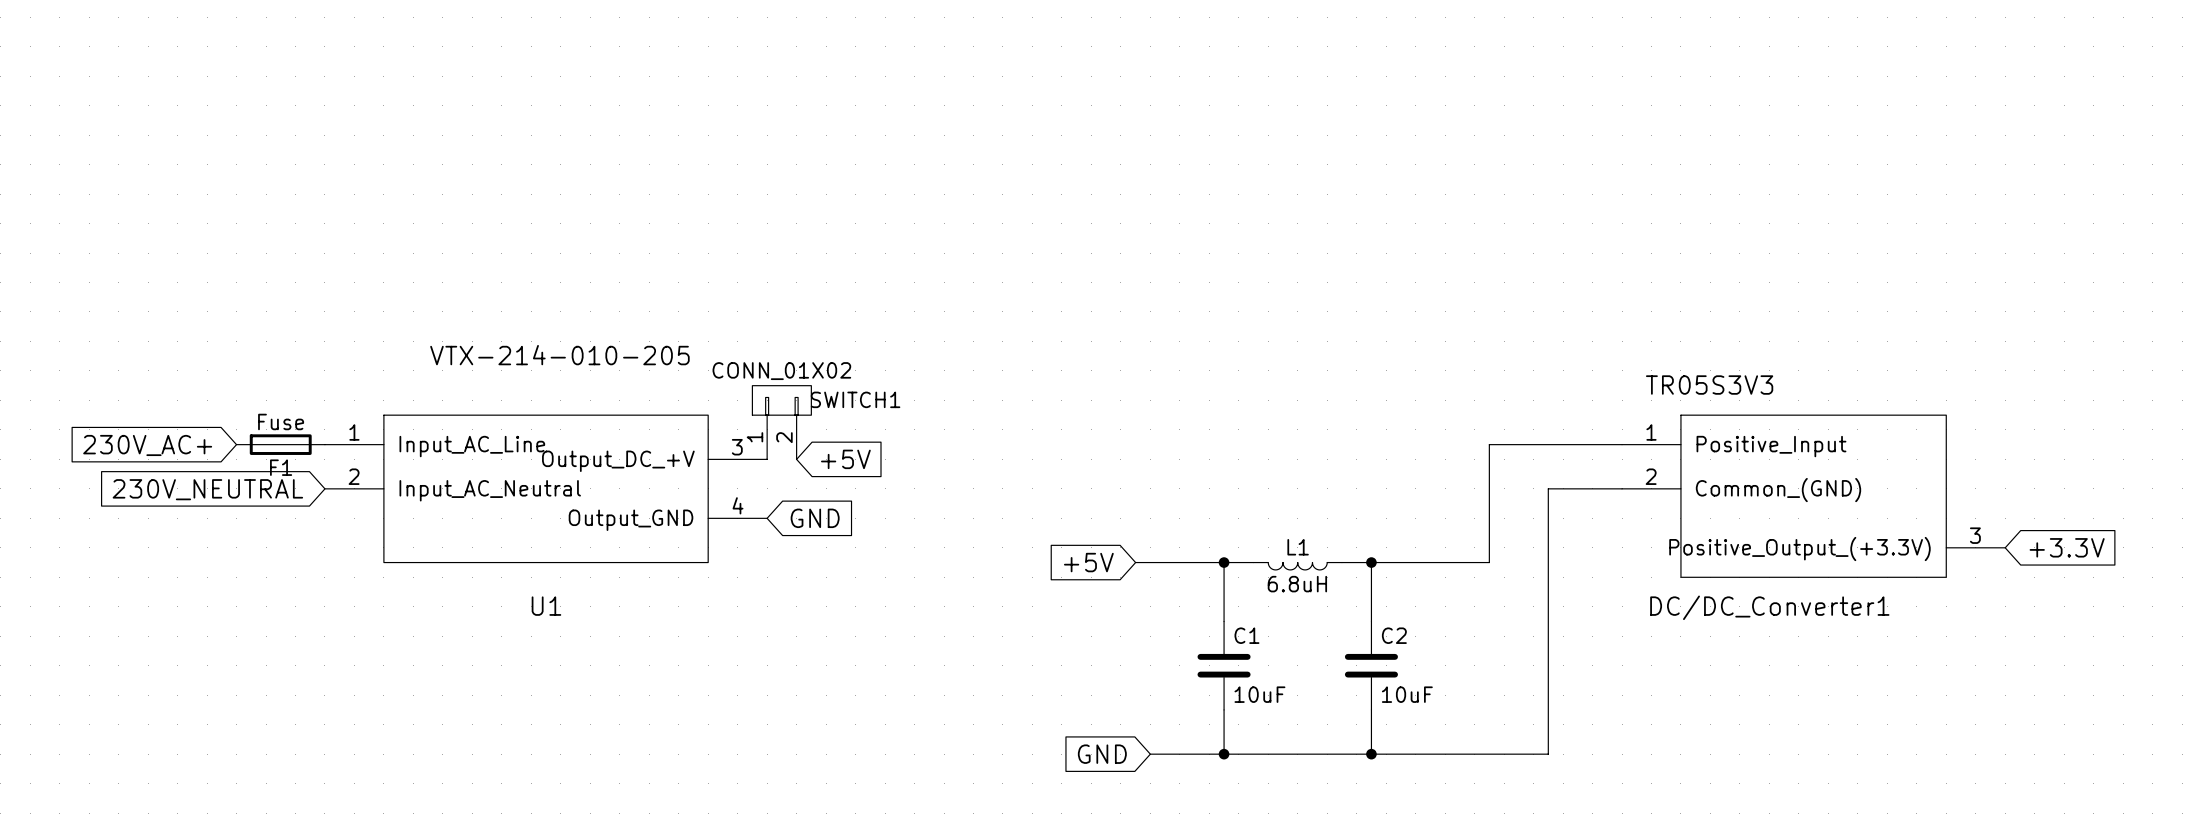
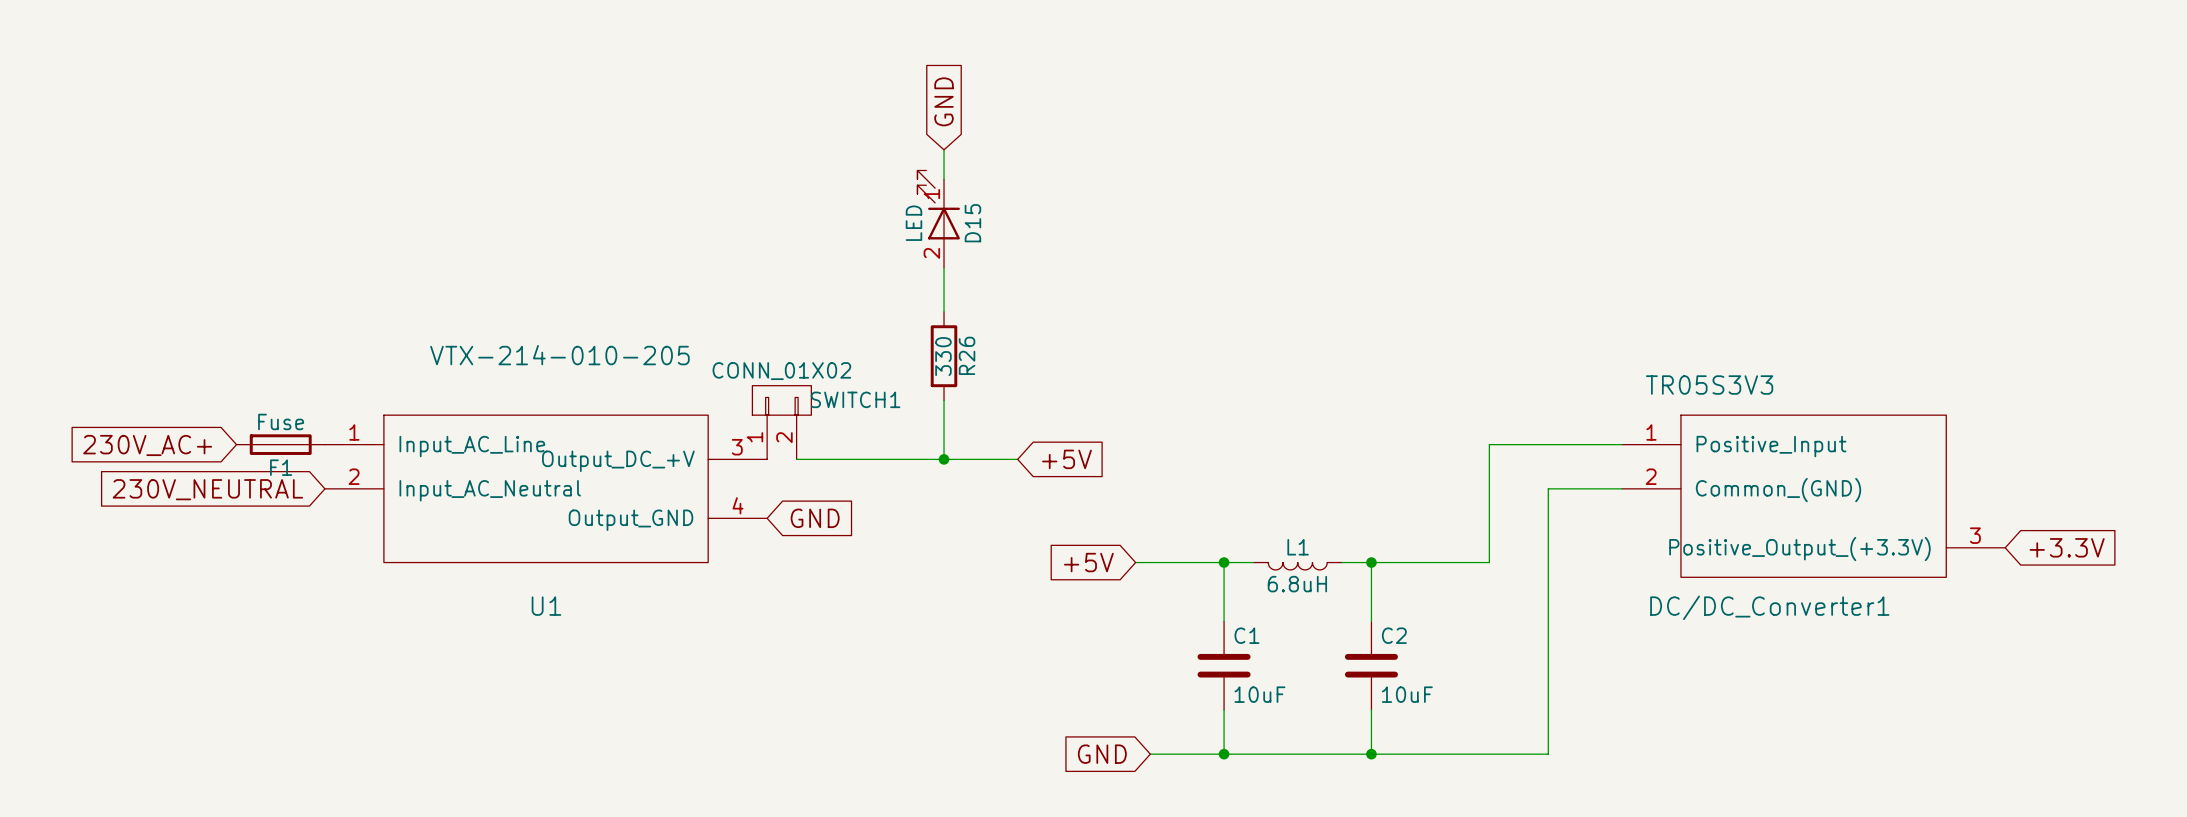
global label: none -> GND (944, 101)
wire: none -> (944, 149) (944, 179)
D15: none -> LED (938, 219)
wire: none -> (944, 267) (944, 311)
R26: none -> 330 (944, 356)
wire: none -> (944, 400) (944, 459)
wire: none -> (796, 459) (1017, 459)
global label position: +5V (845, 459) -> +5V (1066, 459)
junction: none -> (944, 459)

